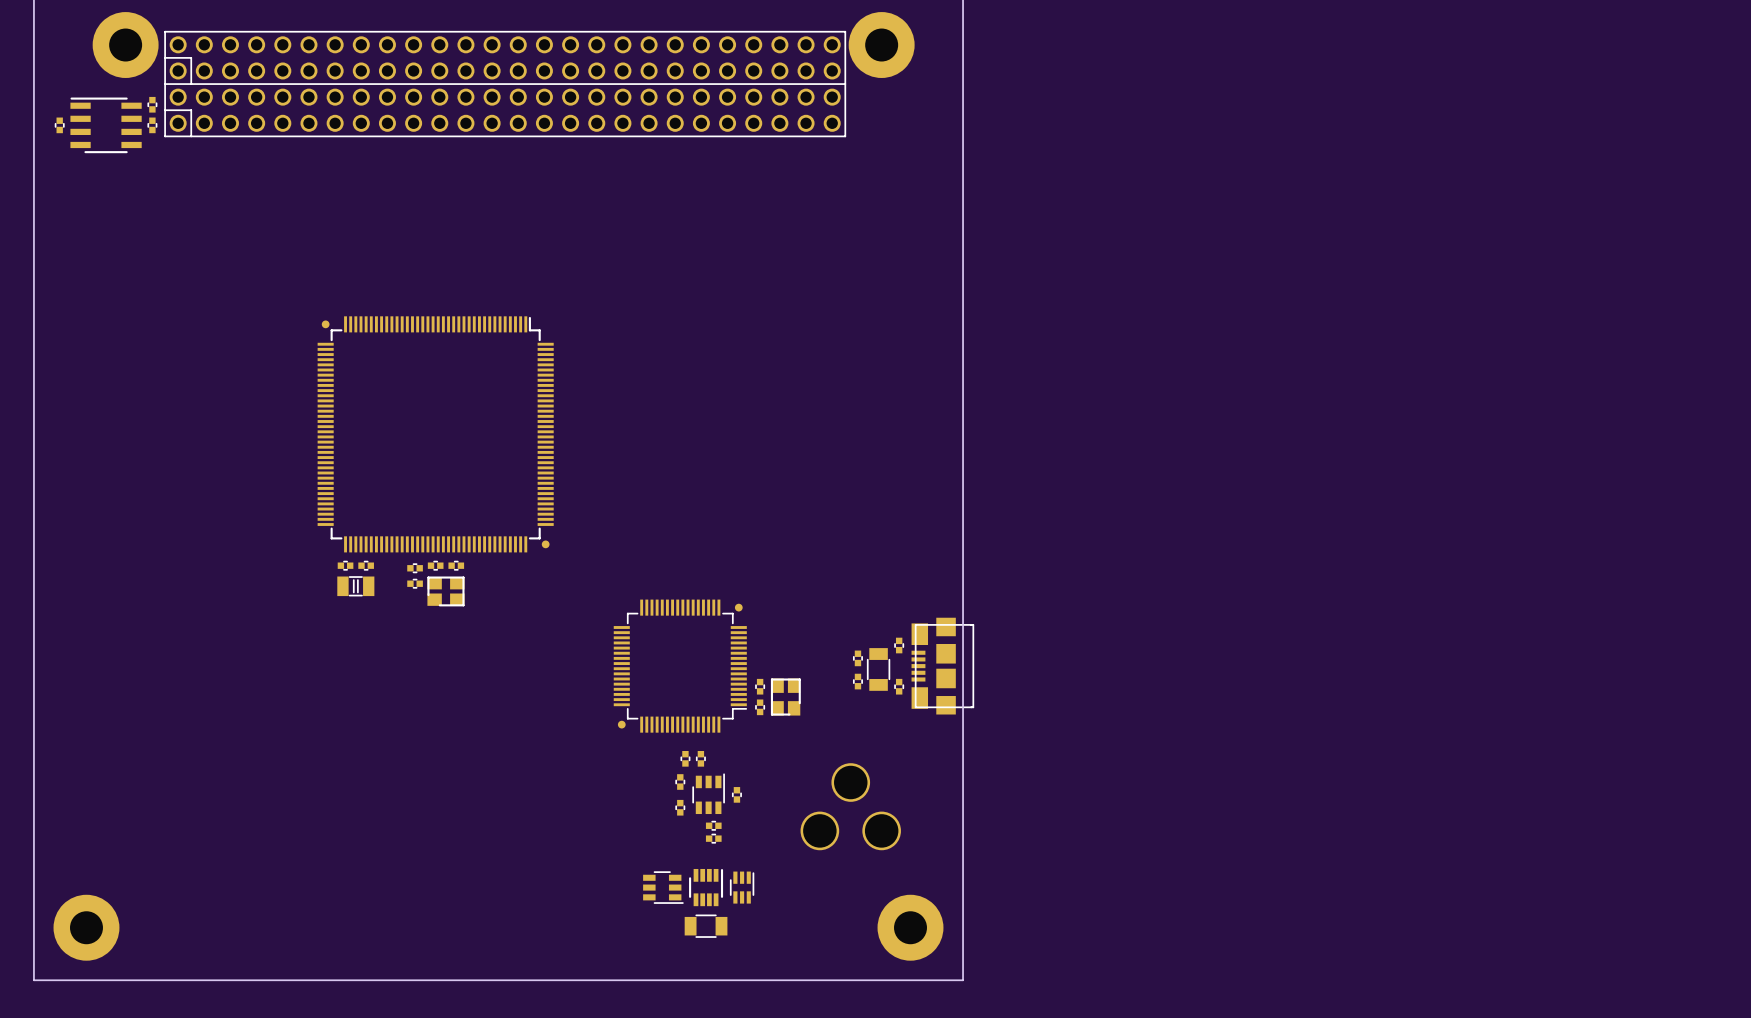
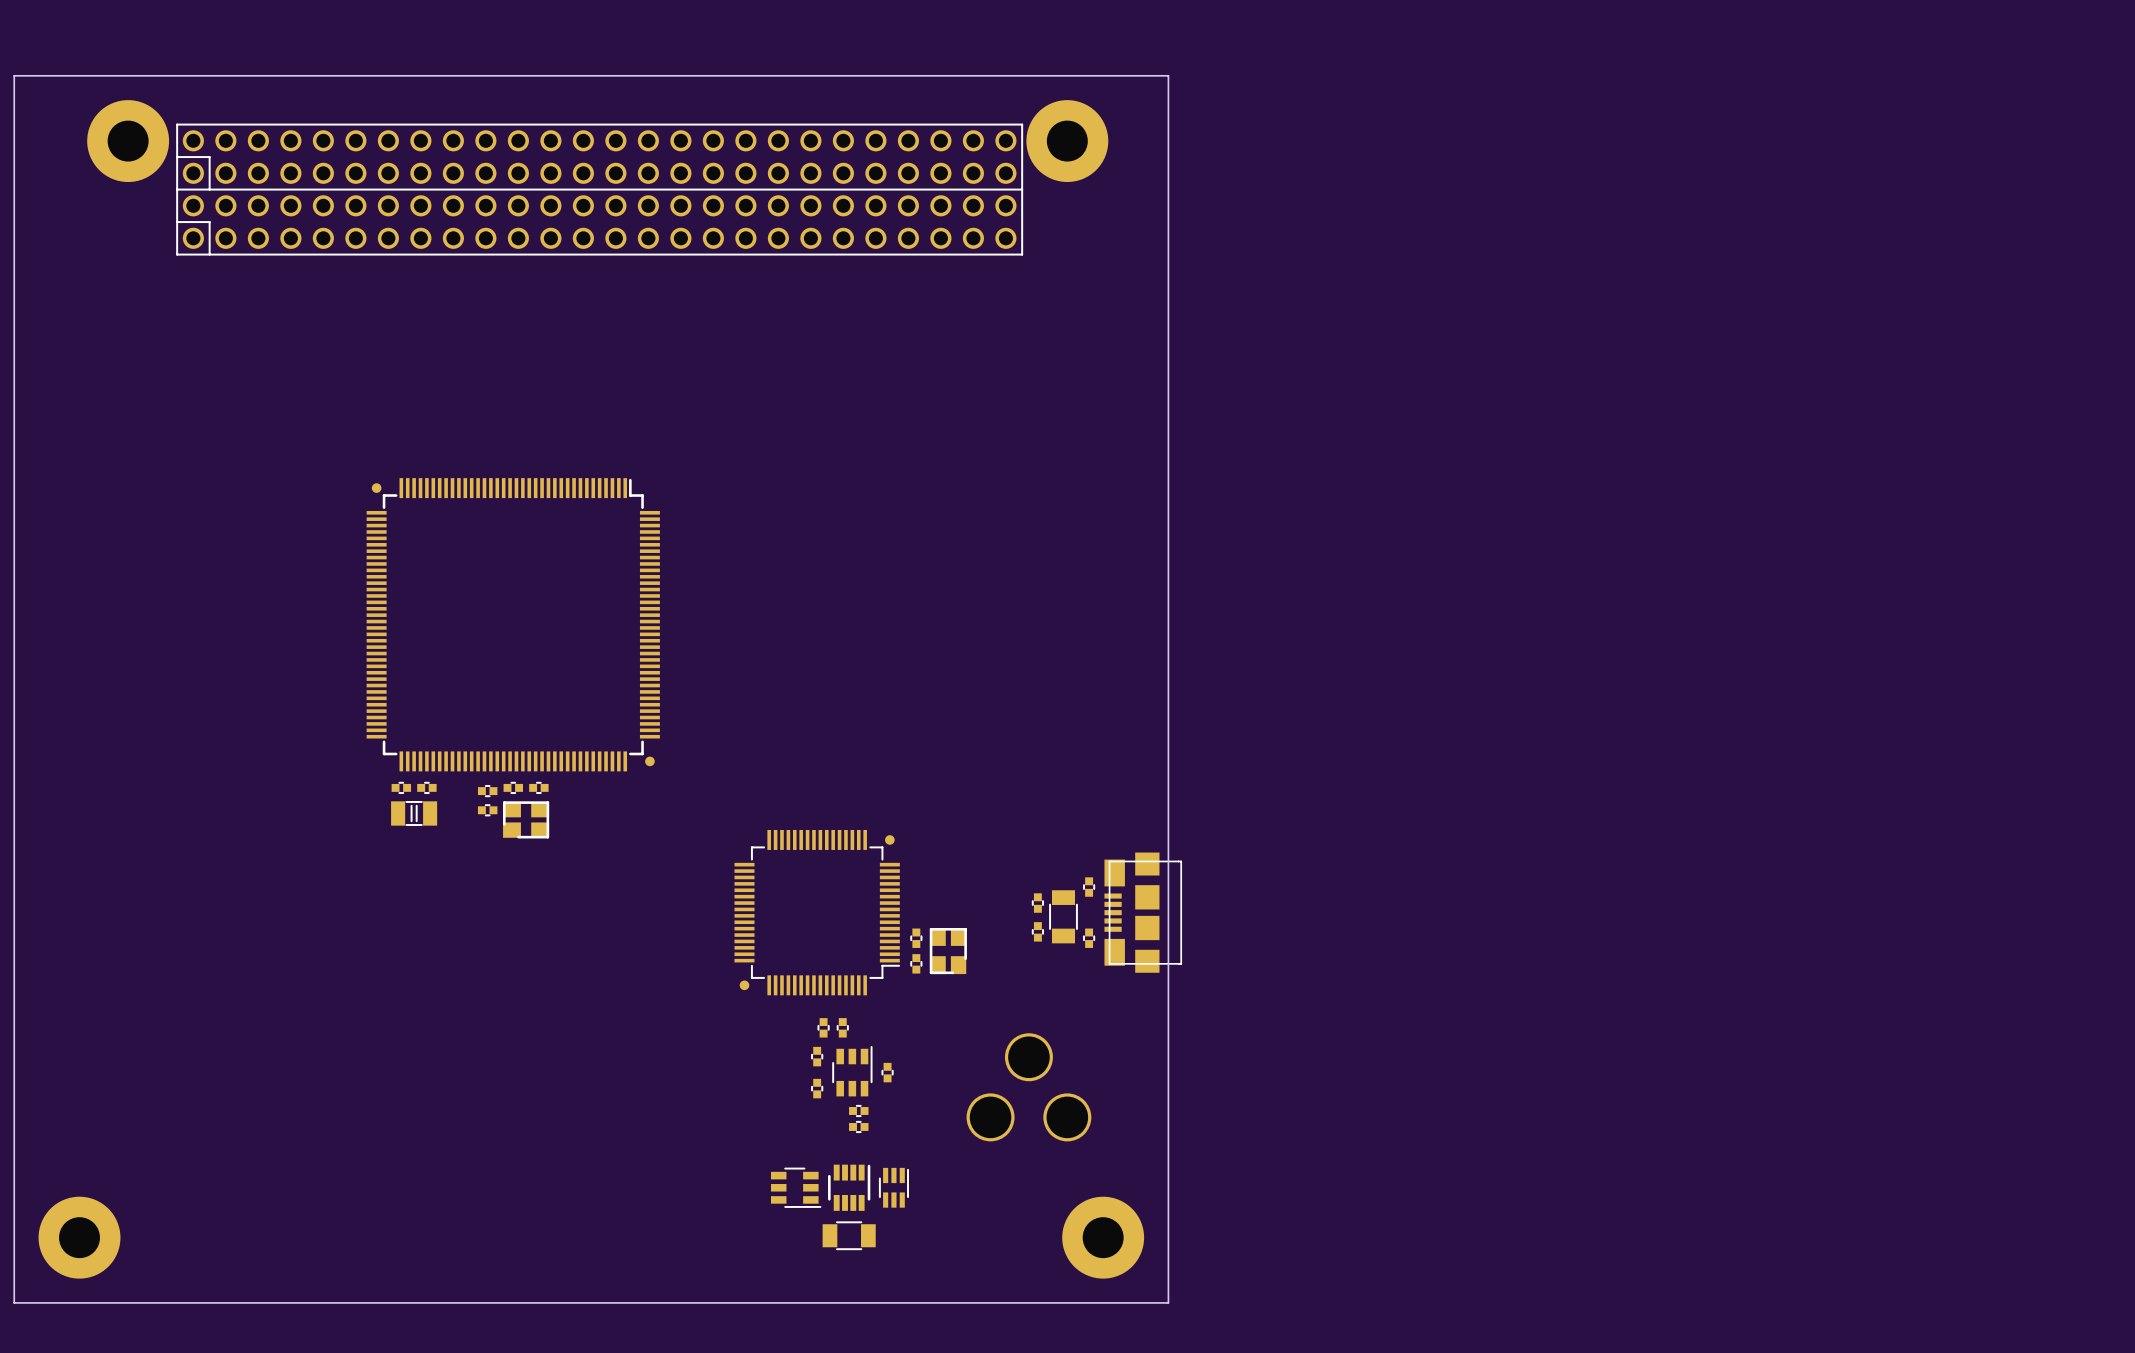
part: (152, 104) -> none
part: (59, 125) -> none
part: (106, 125) -> none
part: (152, 125) -> none

